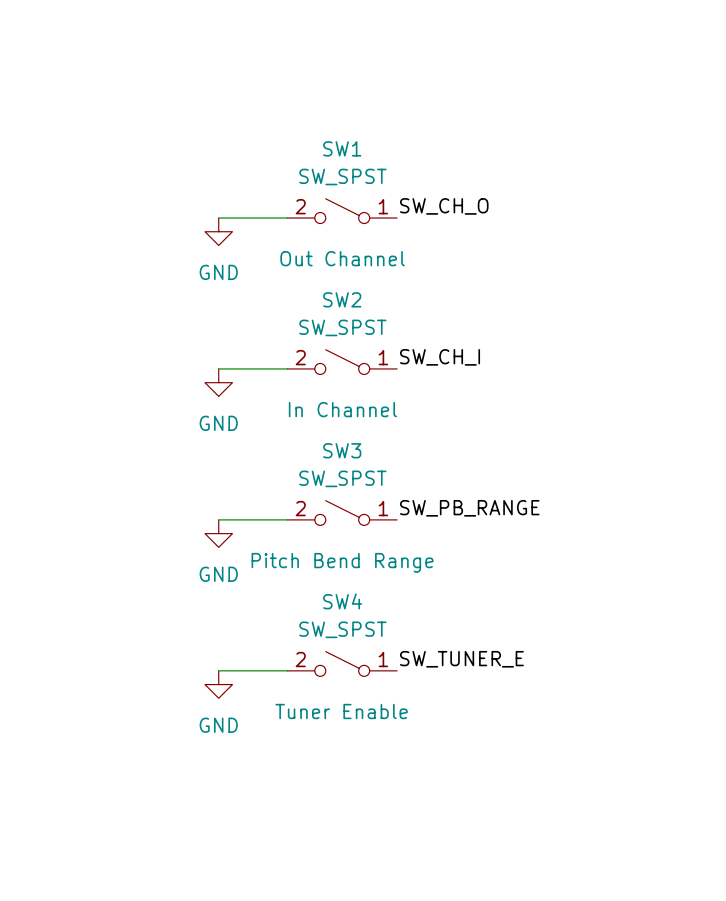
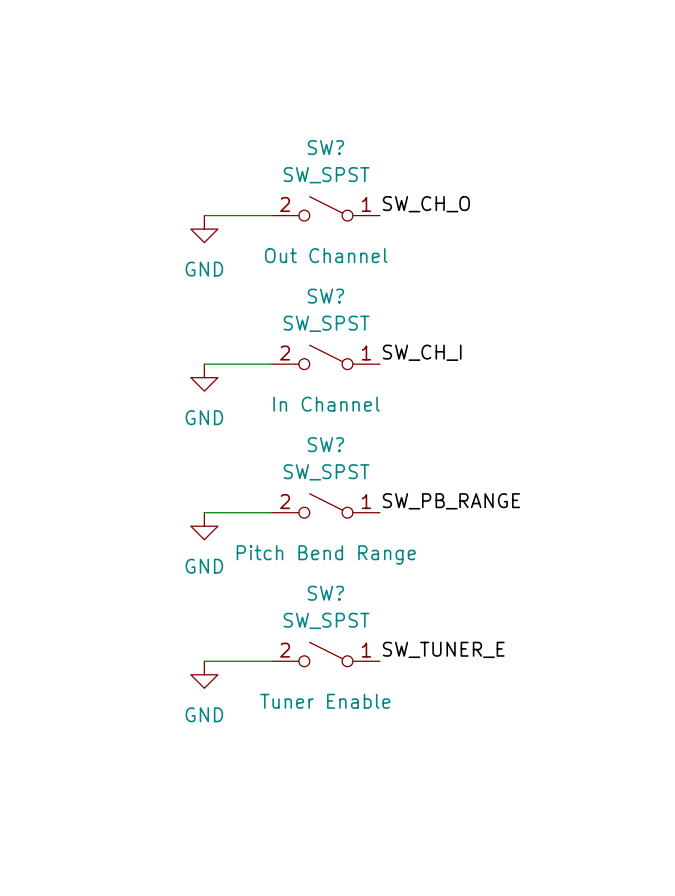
SW1 name: SW1 (342, 148) -> SW? (325, 147)
SW2 name: SW2 (342, 299) -> SW? (325, 296)
SW3 name: SW3 (342, 450) -> SW? (325, 444)
SW4 name: SW4 (342, 601) -> SW? (325, 593)

